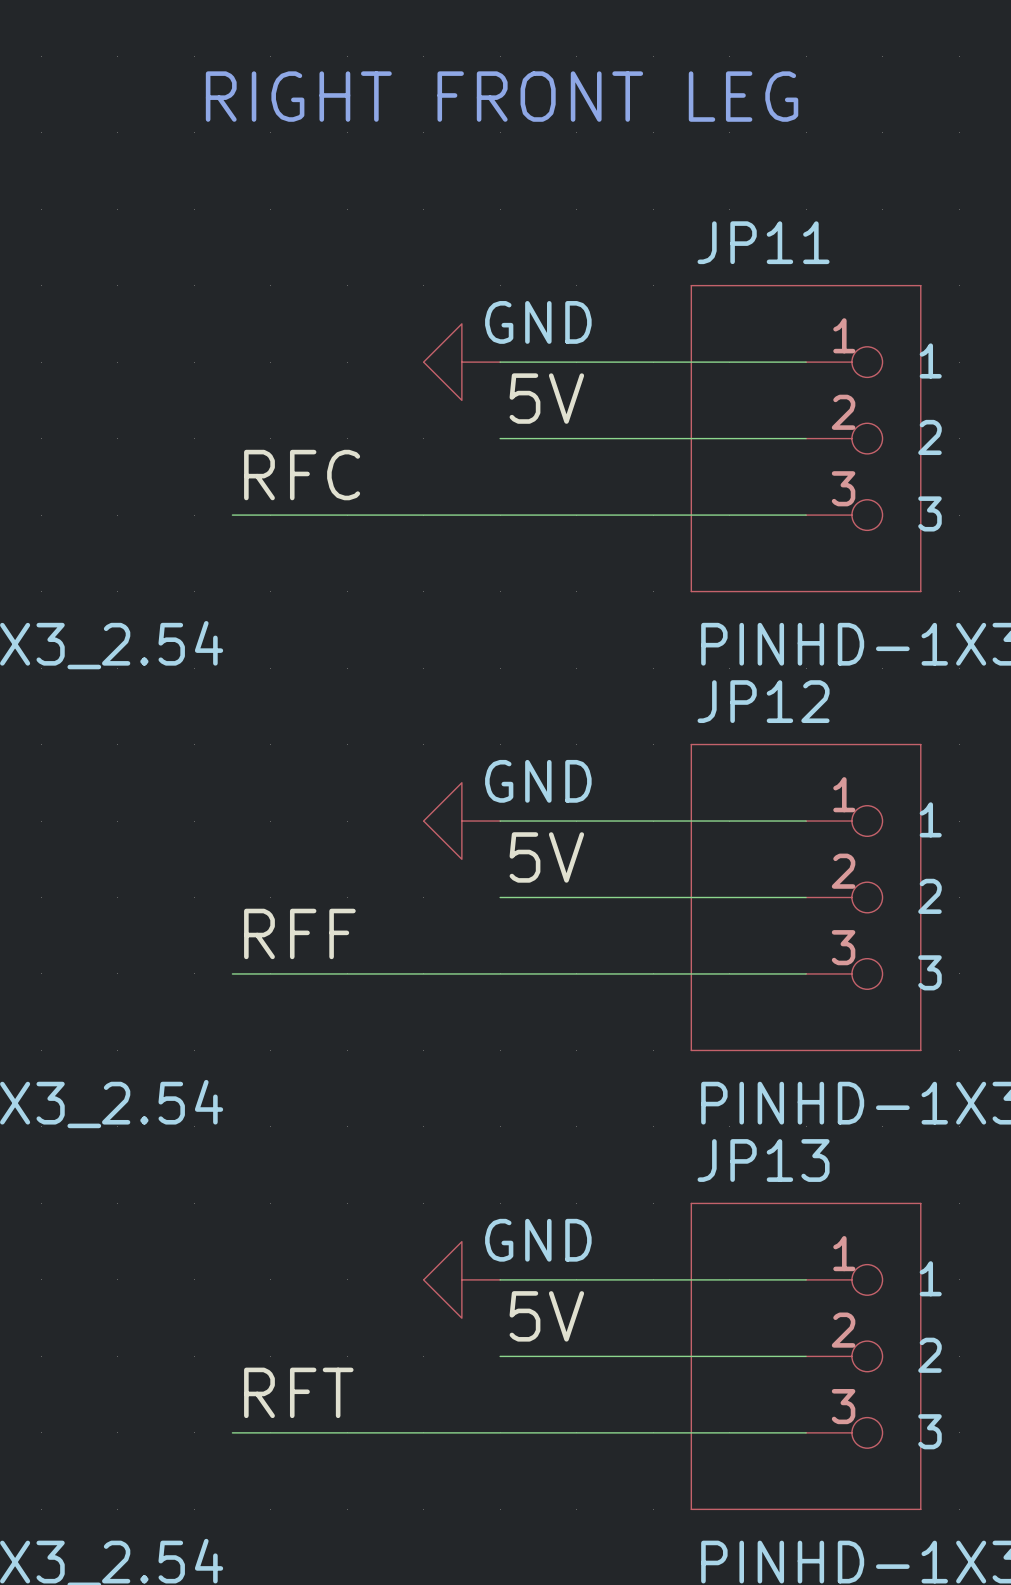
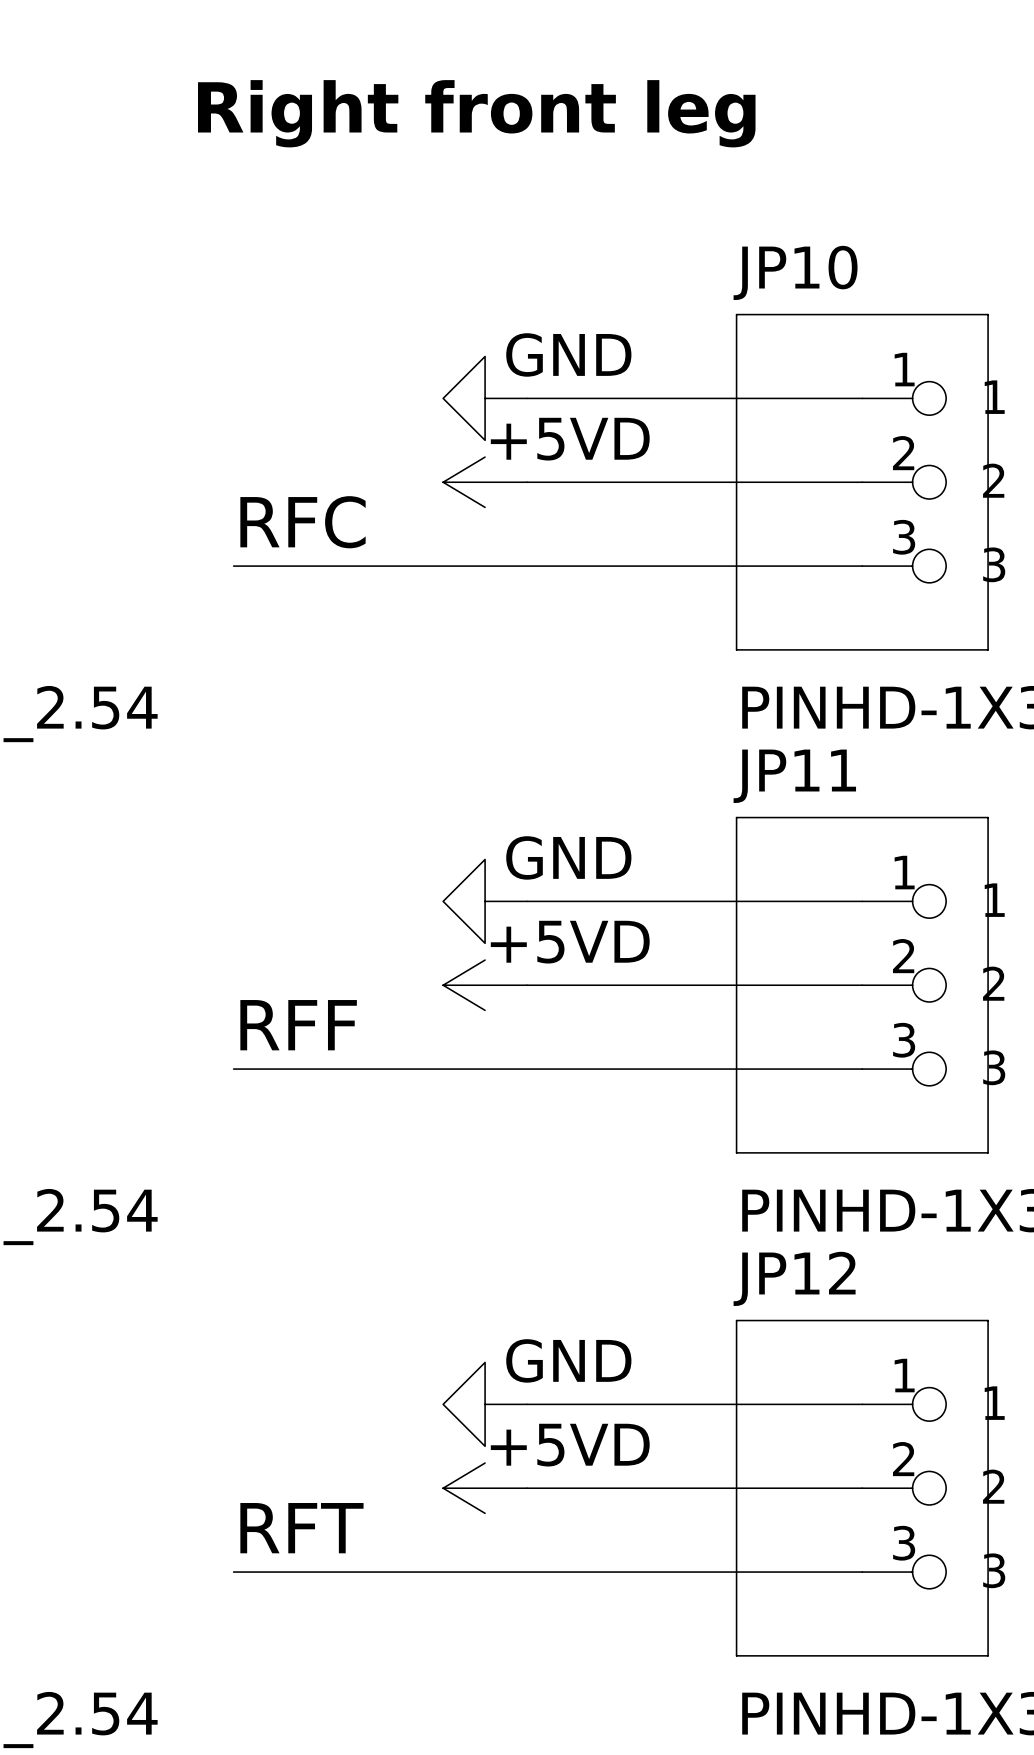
text: RIGHT FRONT LEG (502, 96) -> Right front leg (476, 113)
JP11 name: JP11 (763, 242) -> JP10 (795, 272)
label: 5V (546, 398) -> none
power symbol: none -> +5VD (485, 482)
JP12 name: JP12 (763, 701) -> JP11 (794, 776)
label: 5V (546, 857) -> none
power symbol: none -> +5VD (485, 985)
JP13 name: JP13 (763, 1160) -> JP12 (794, 1278)
label: 5V (546, 1316) -> none
power symbol: none -> +5VD (485, 1488)

